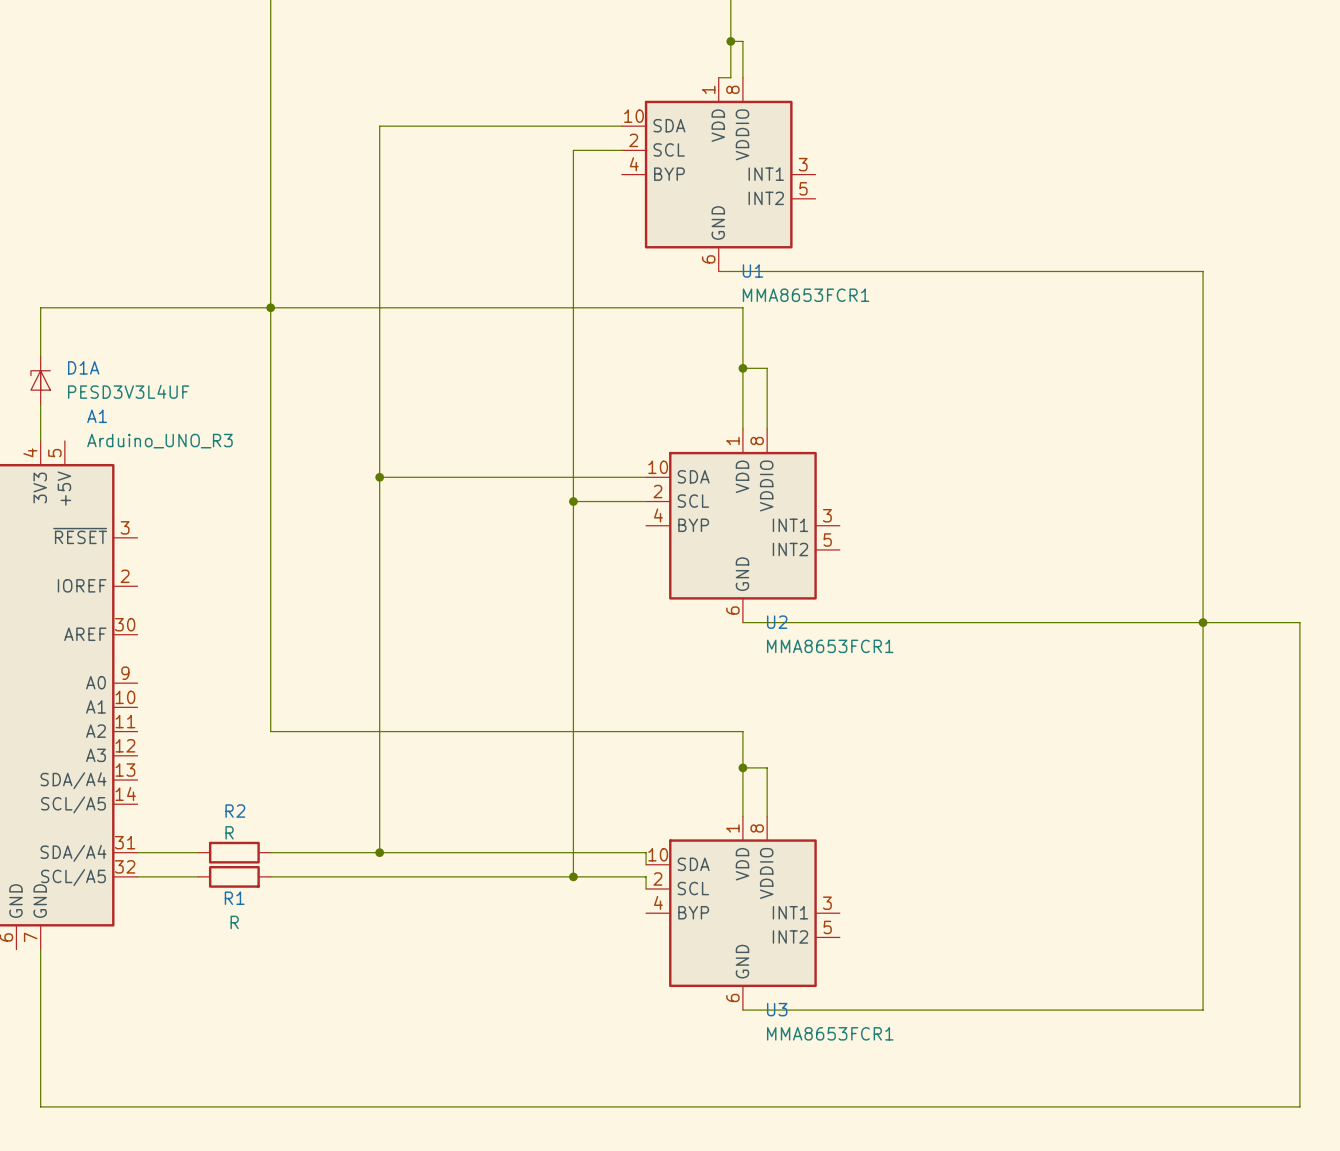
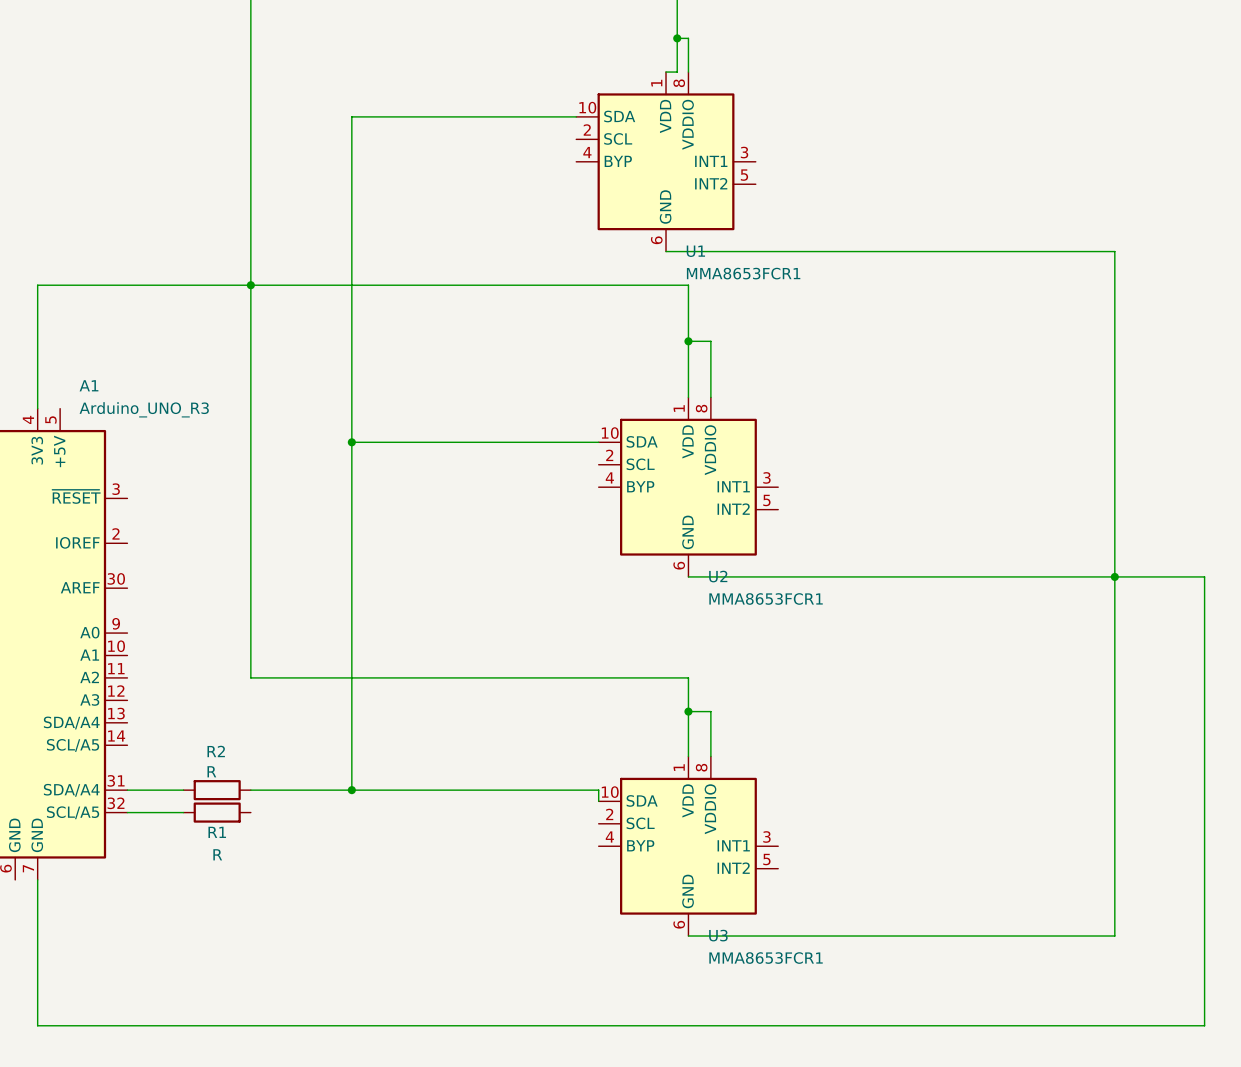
wire: (621, 150) (573, 150) (573, 876) -> none
D1A: PESD3V3L4UF (40, 380) -> none
wire: (573, 501) (646, 501) -> none
junction: (573, 501) -> none
wire: (270, 876) (646, 876) (646, 888) -> none
junction: (573, 876) -> none

